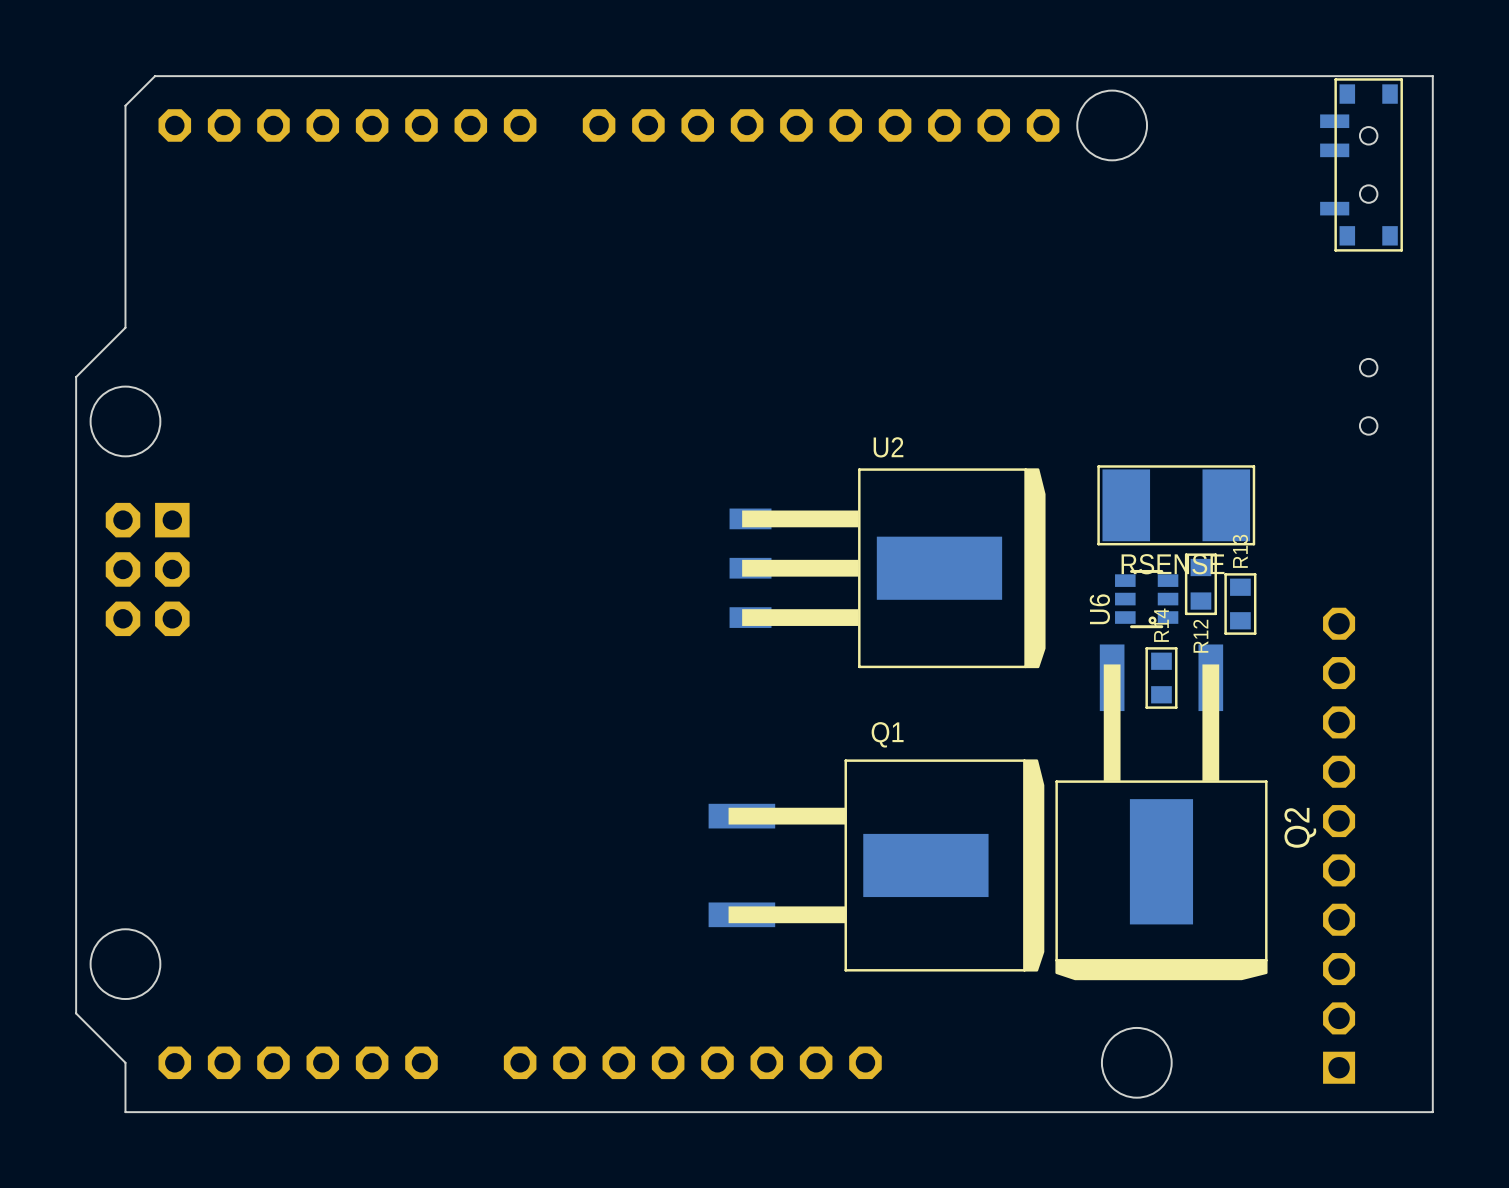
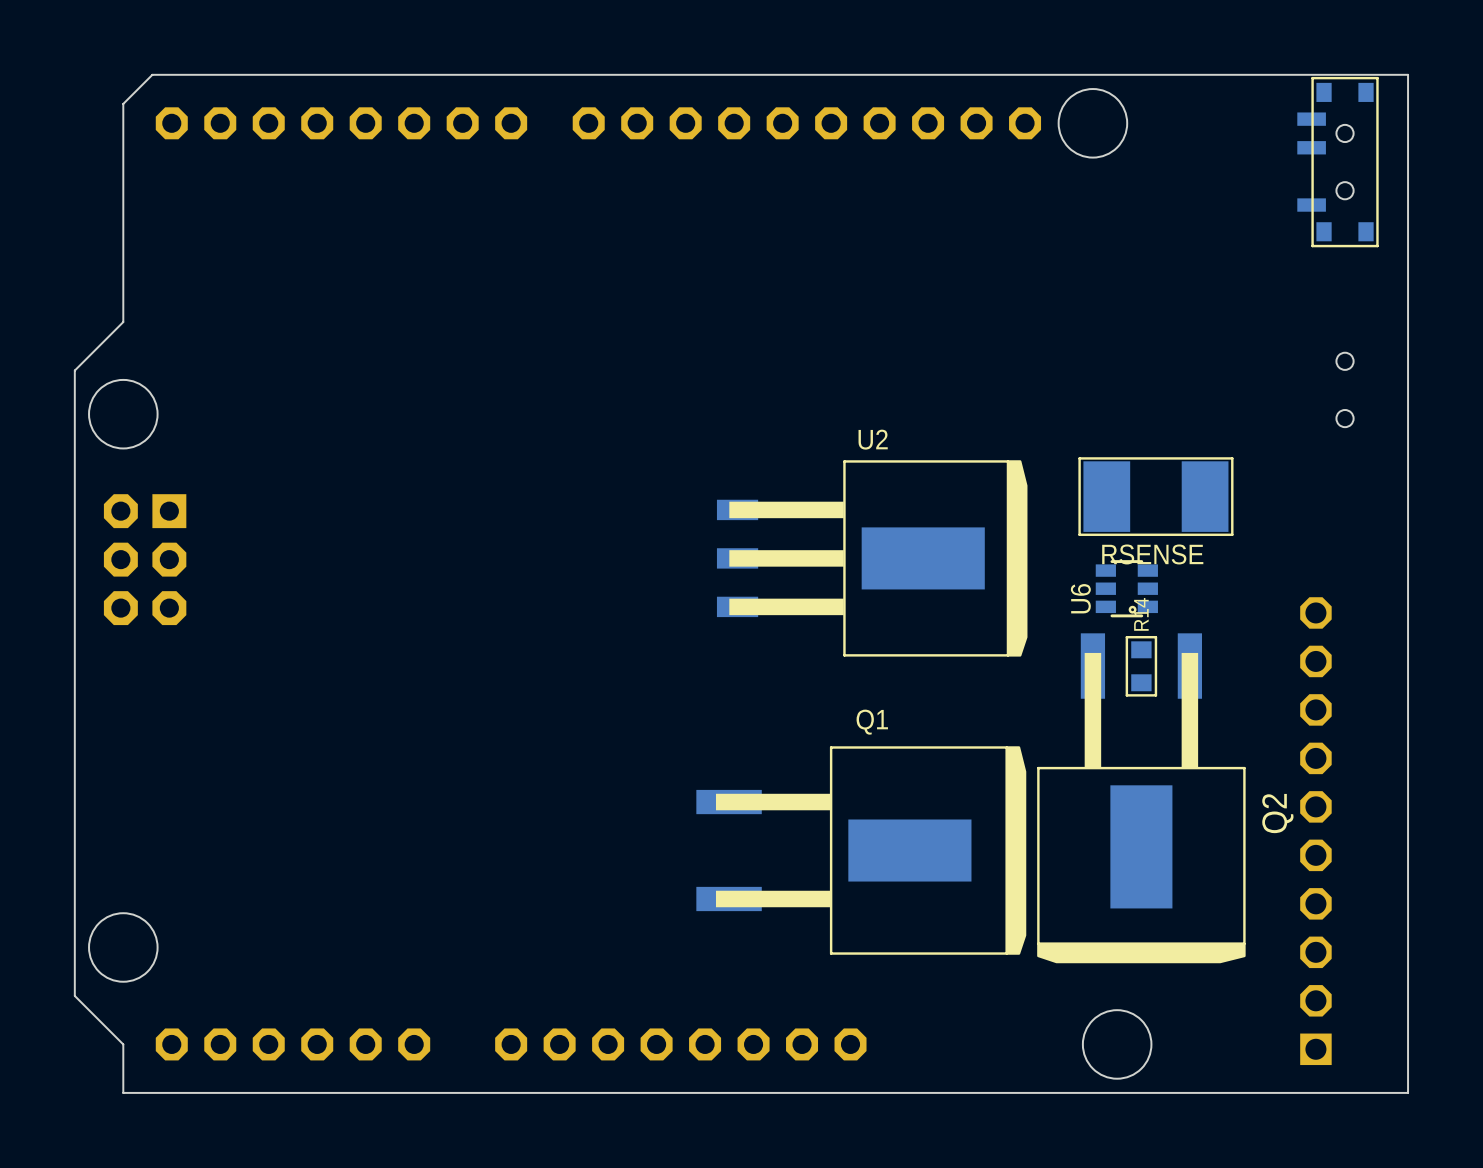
R12: (1200, 584) -> none
R13: (1240, 604) -> none

